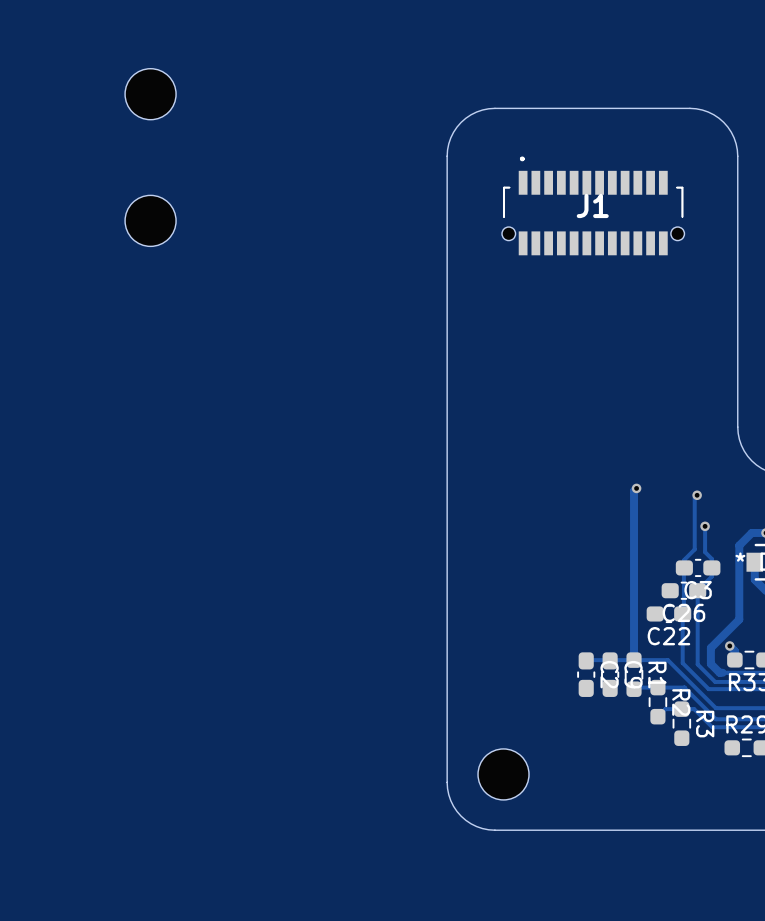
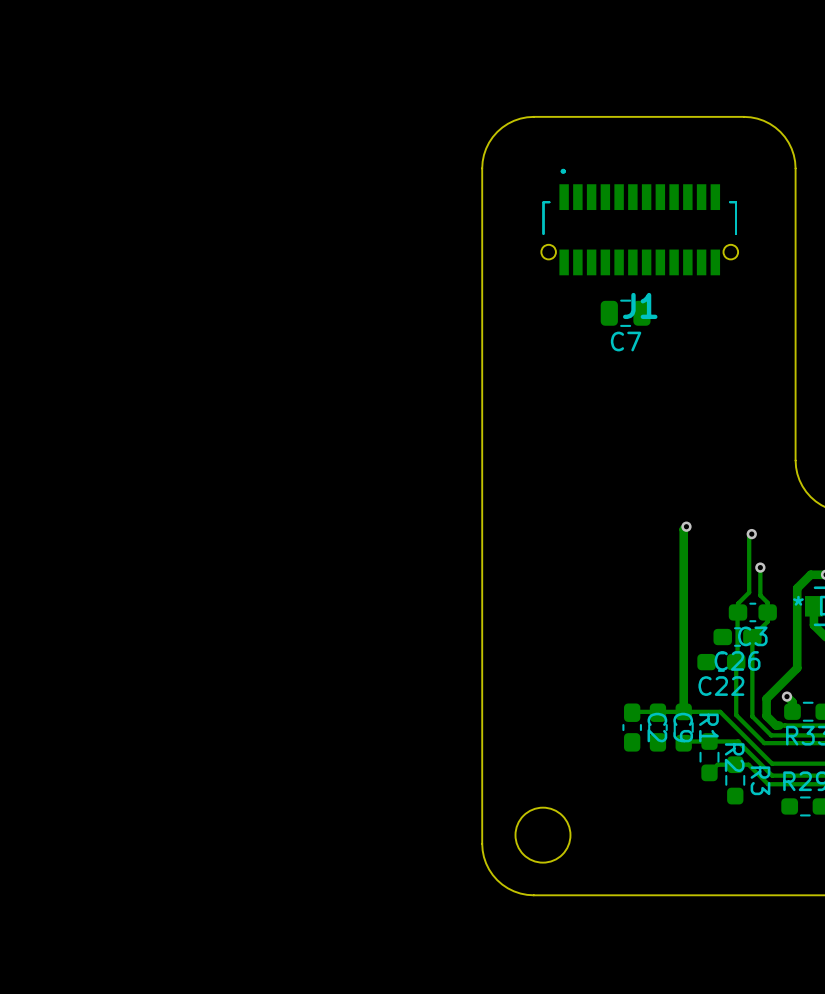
part: (150, 94) -> none
J1 name position: J1 (592, 205) -> J1 (640, 305)
part: (150, 220) -> none
C7: none -> (625, 313)

